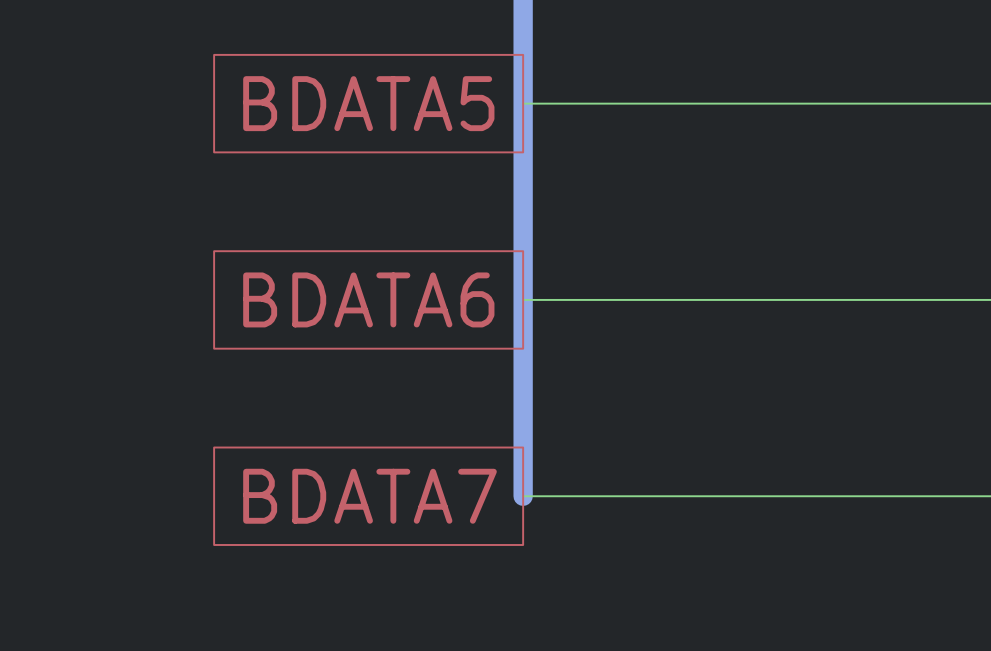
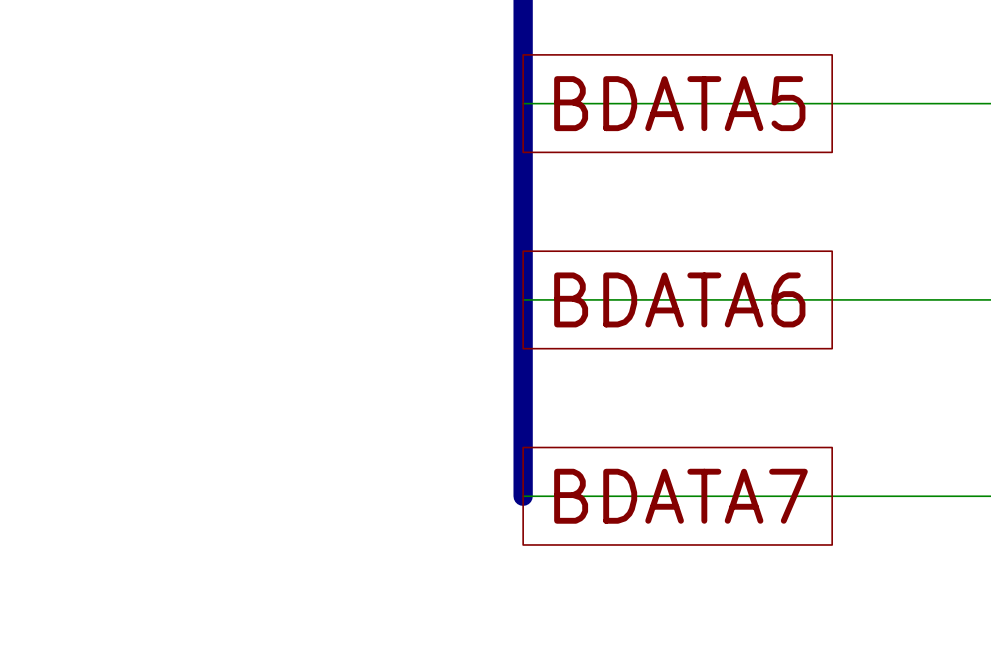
global label rotation: 0° (368, 103) -> 180° (679, 103)
global label rotation: 0° (368, 299) -> 180° (679, 299)
global label rotation: 0° (369, 496) -> 180° (680, 496)

